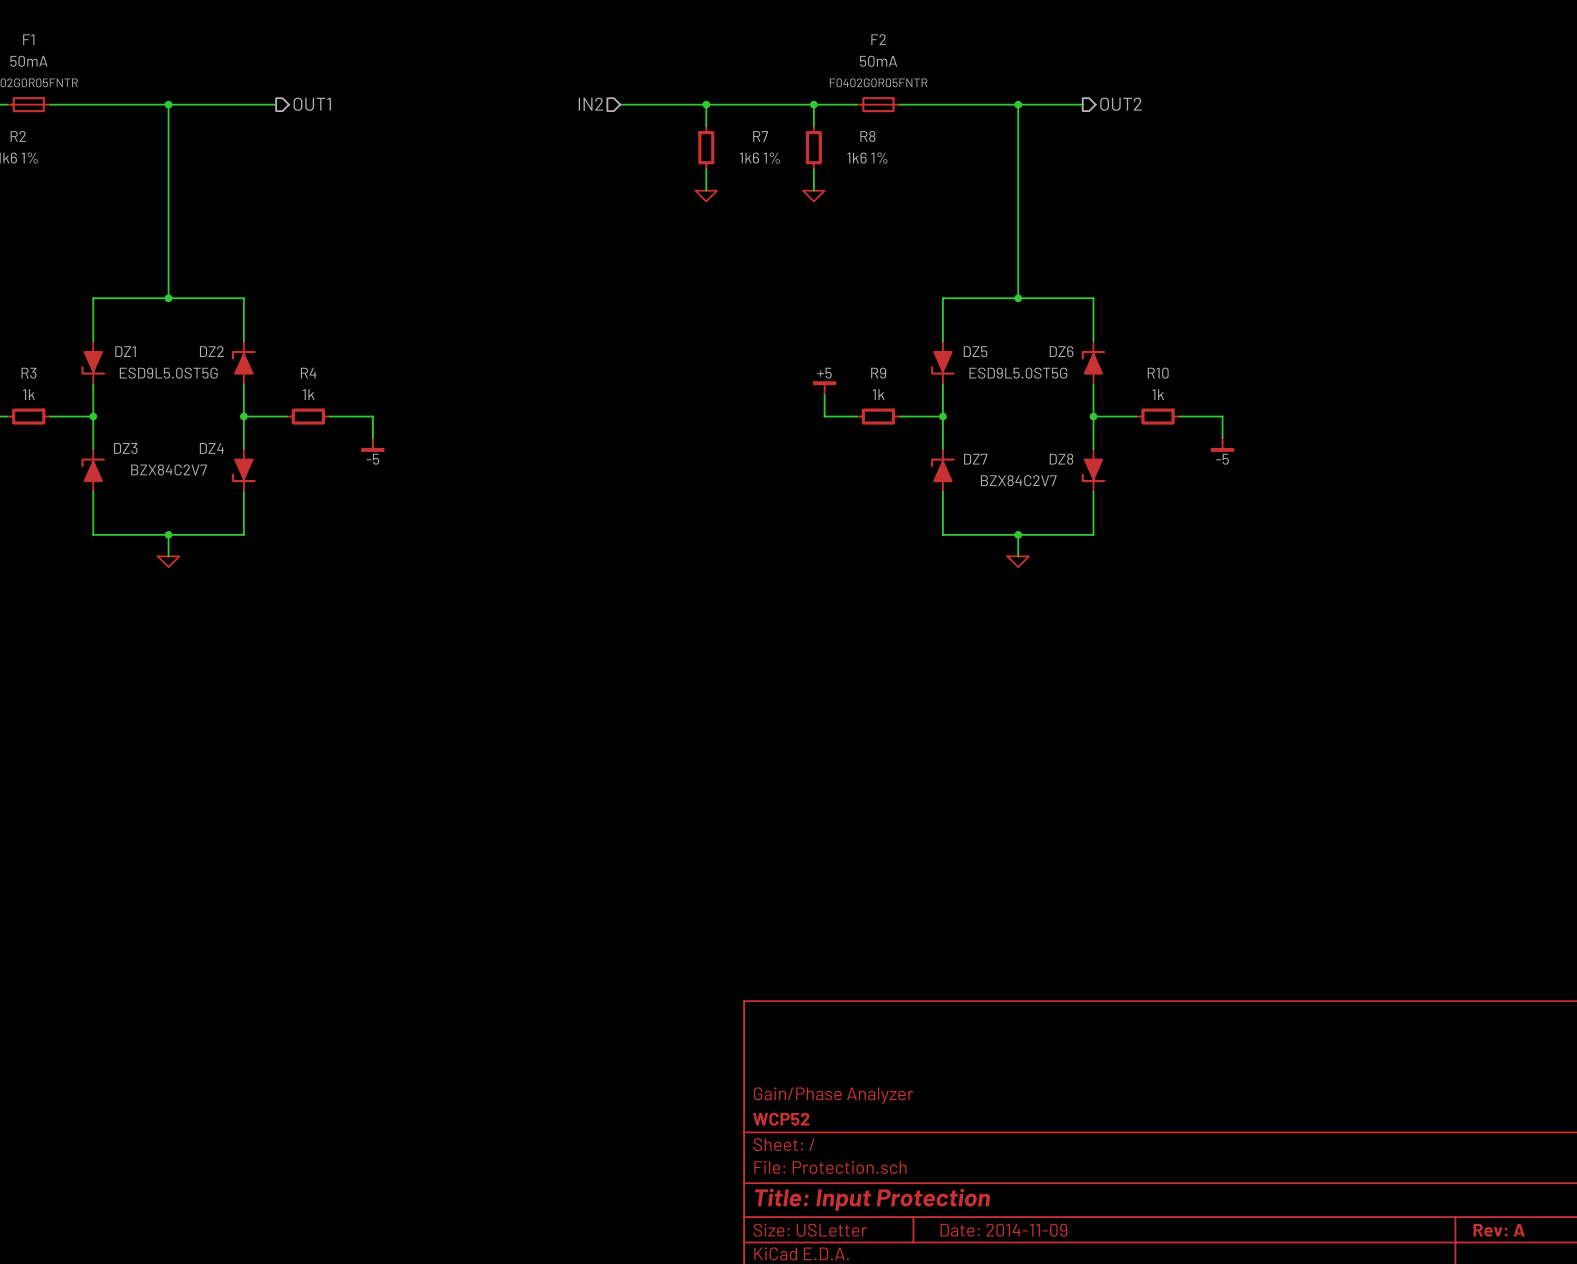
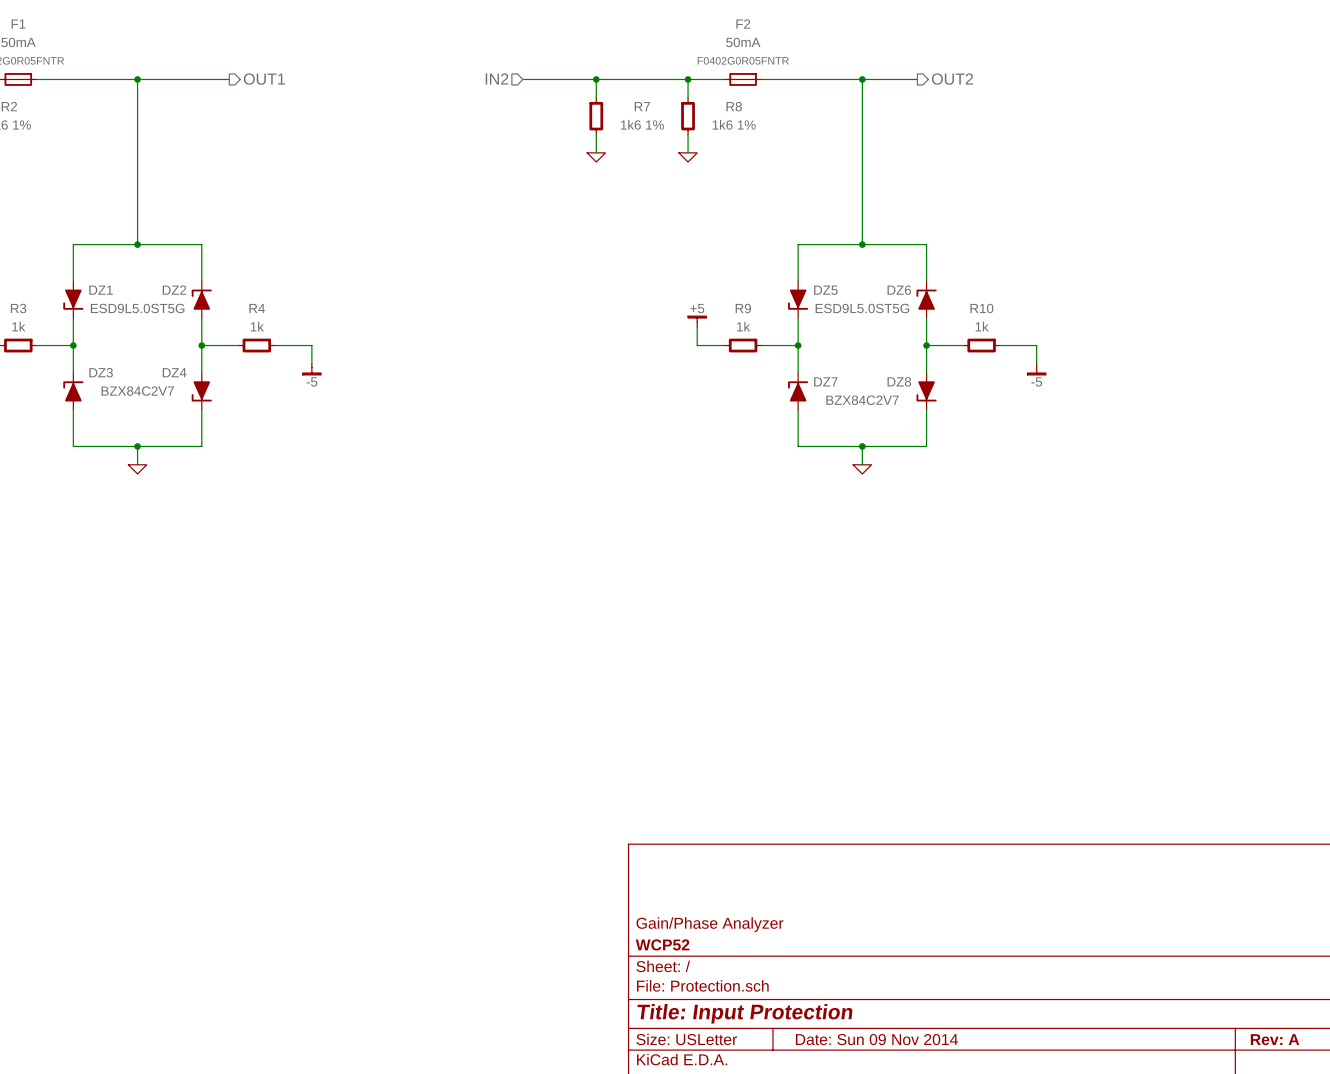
title block: Date: 2014-11-09 (1003, 1230) -> Date: Sun 09 Nov 2014 (876, 1039)

